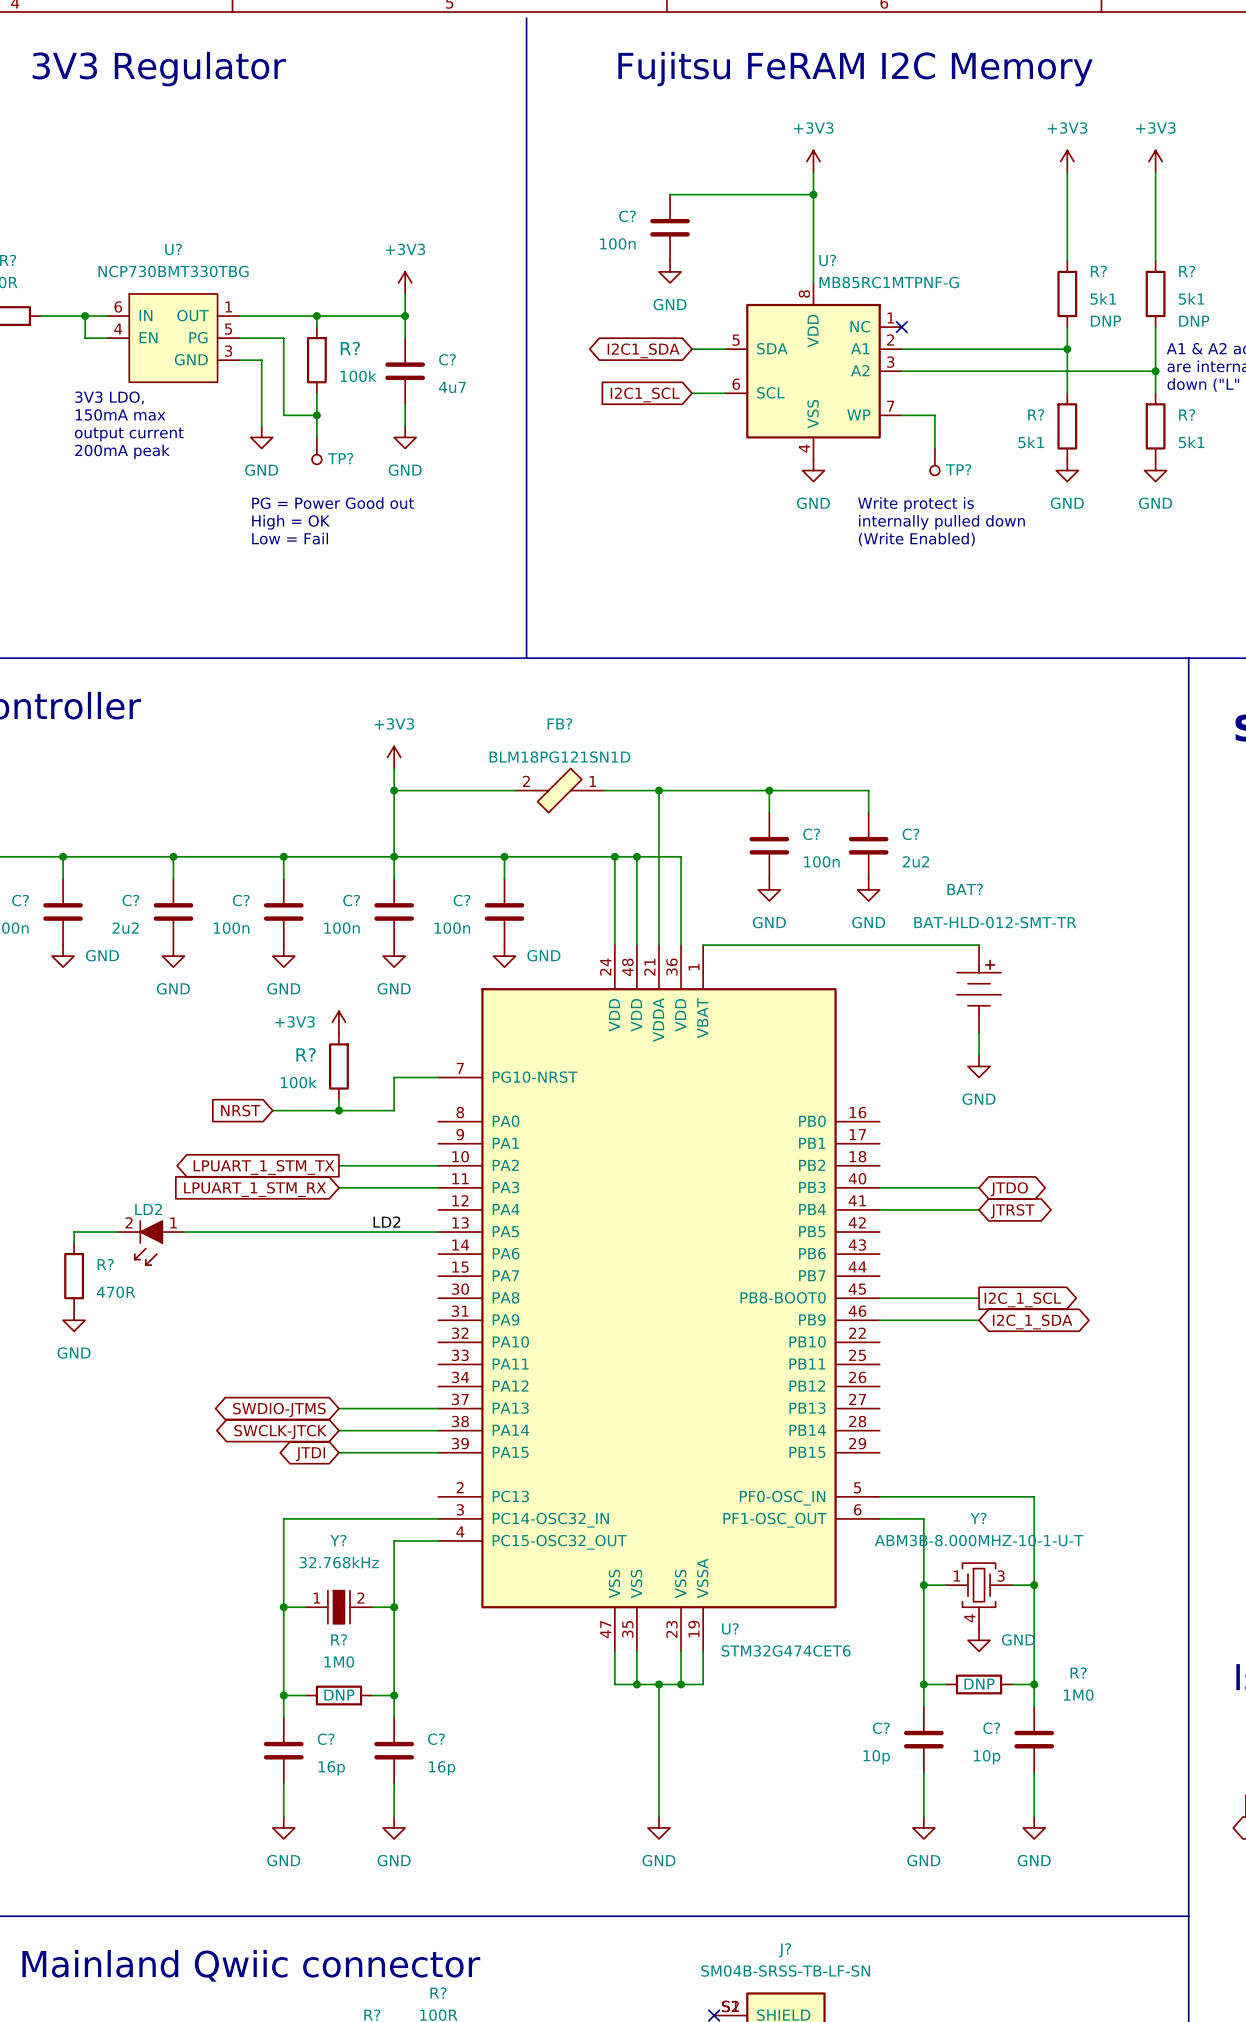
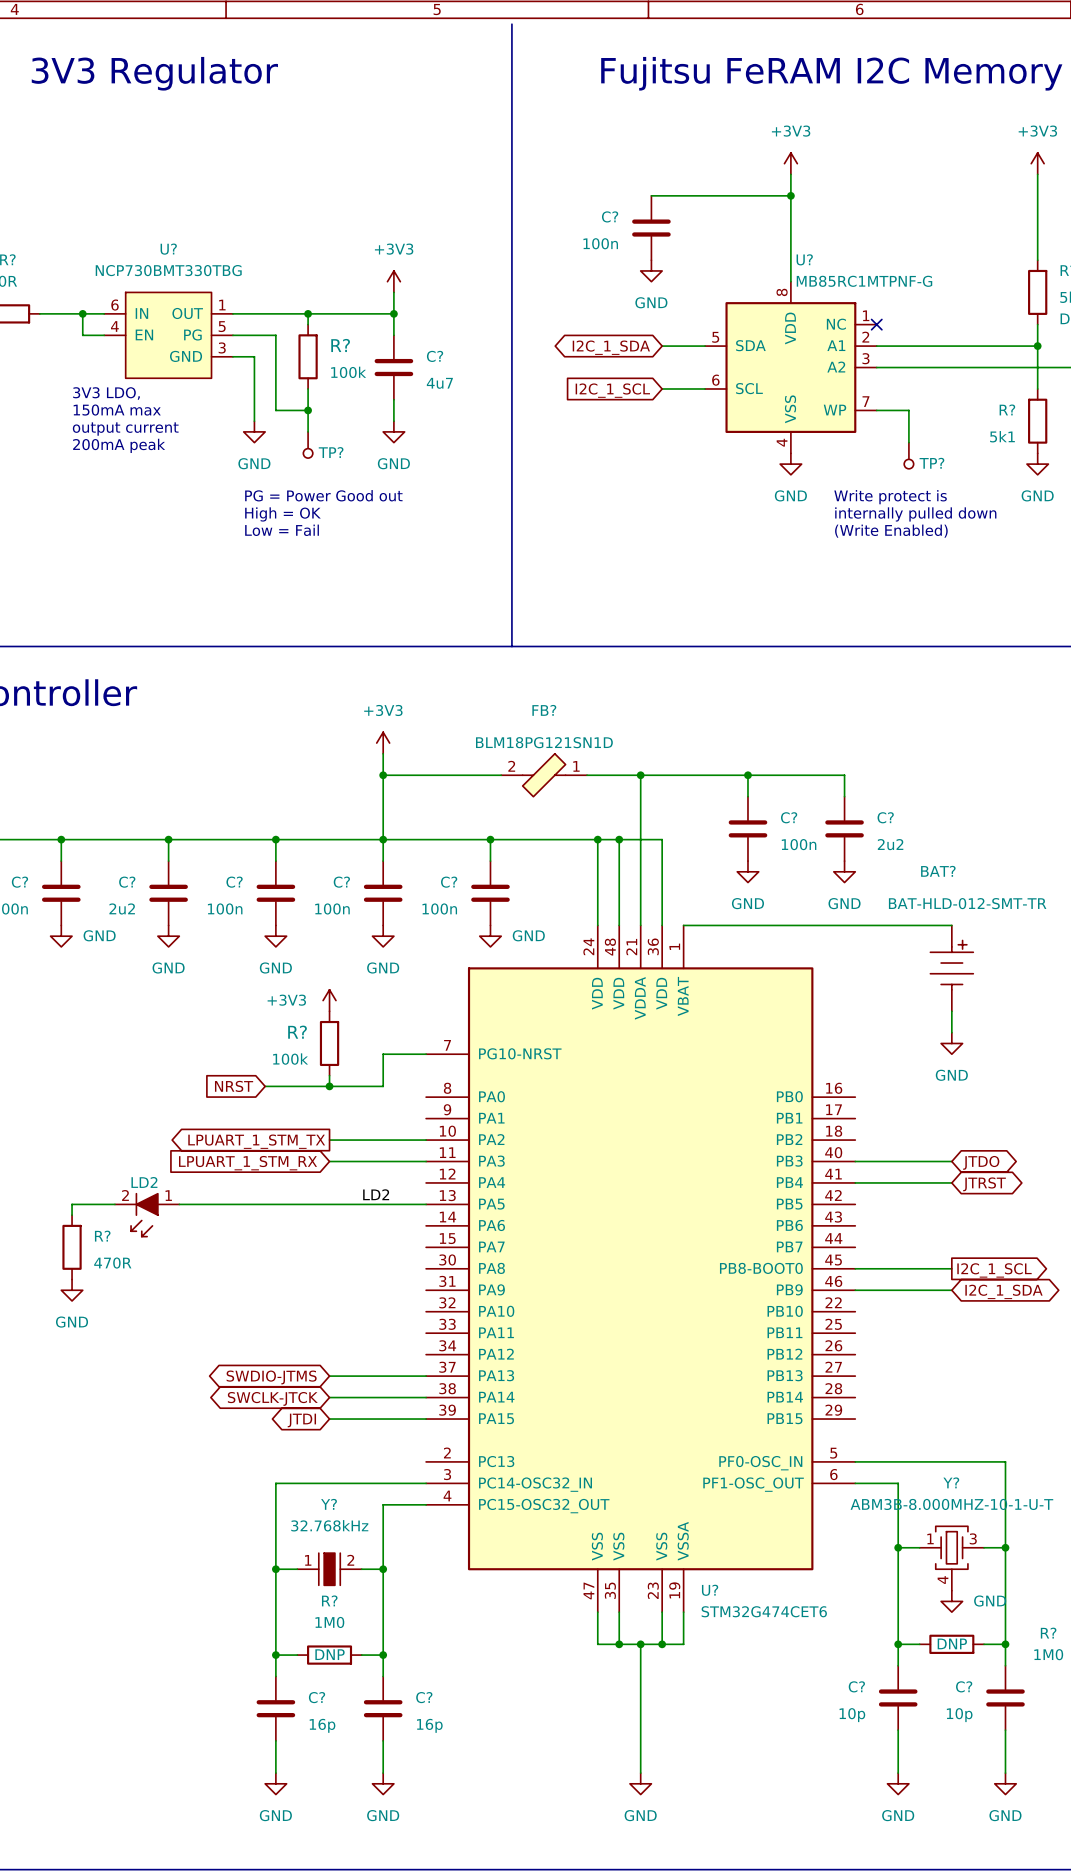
wire: none -> (662, 346) (672, 346)
global label: I2C1_SDA (643, 350) -> I2C_1_SDA (611, 347)
wire: none -> (662, 388) (672, 388)
global label: I2C1_SCL (645, 394) -> I2C_1_SCL (612, 390)

